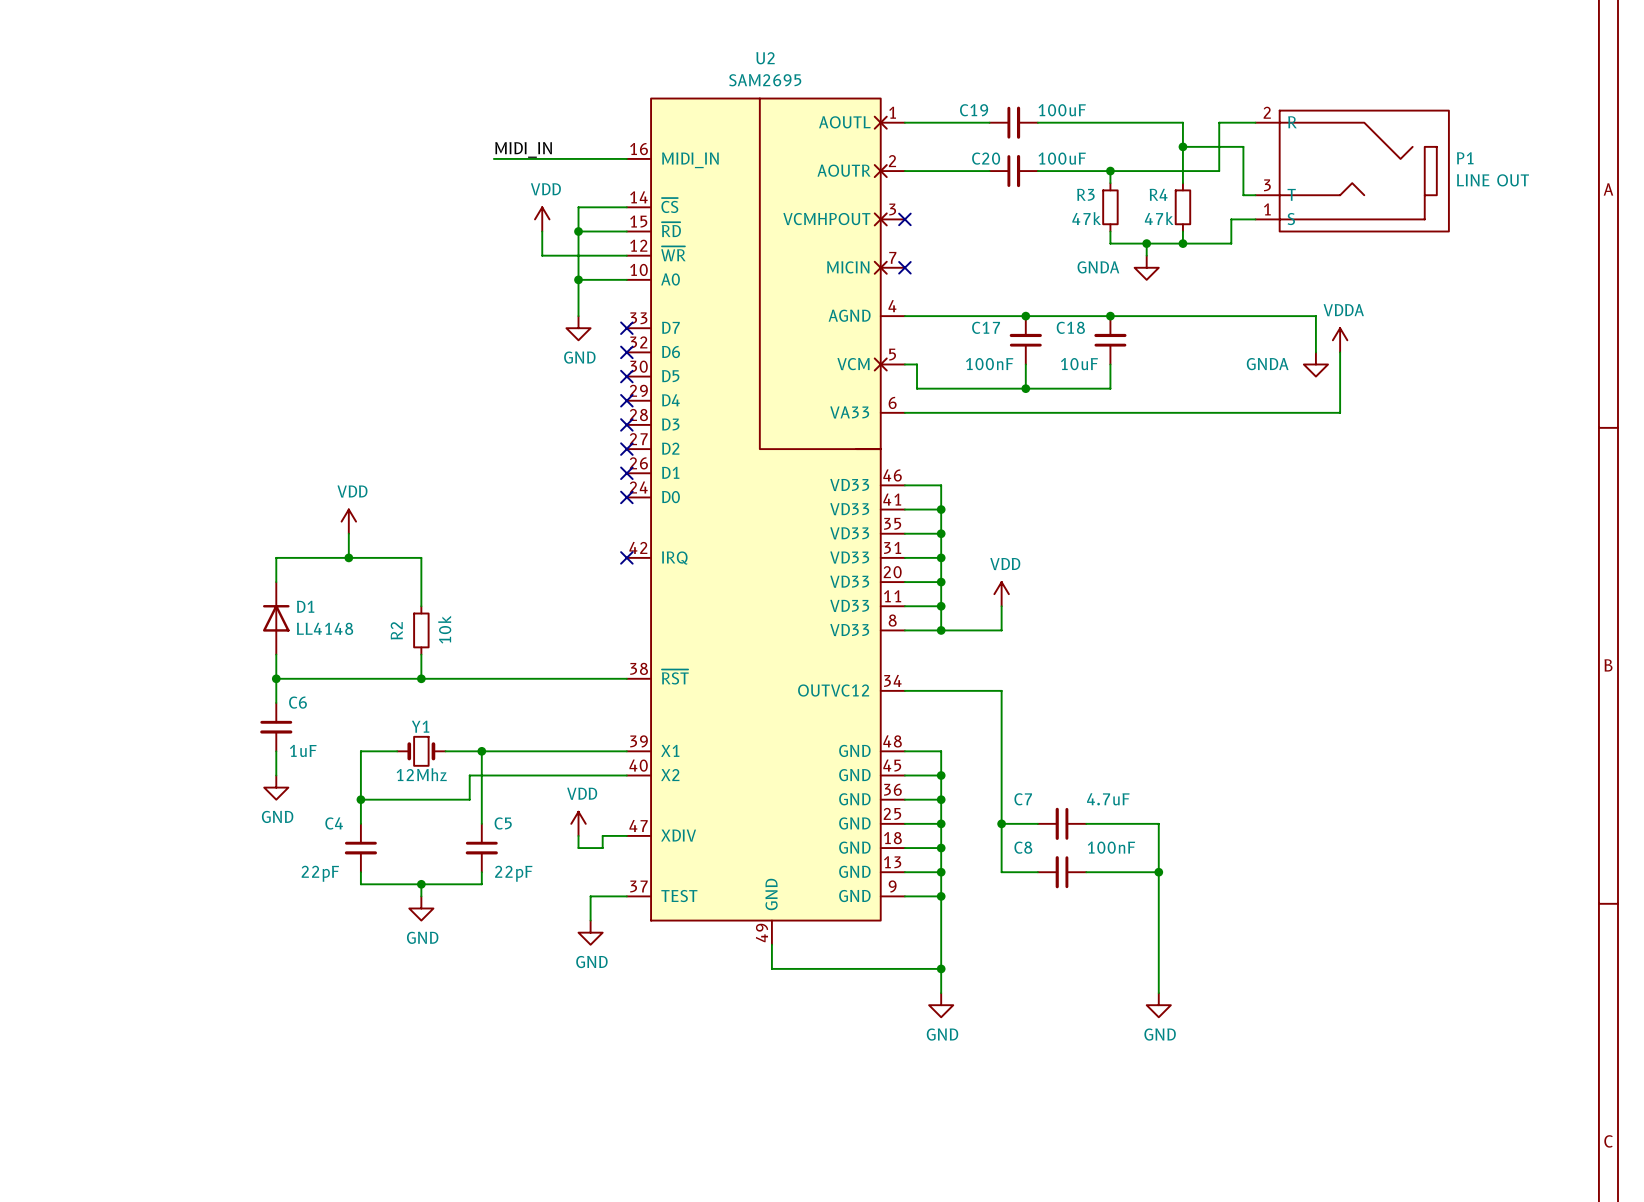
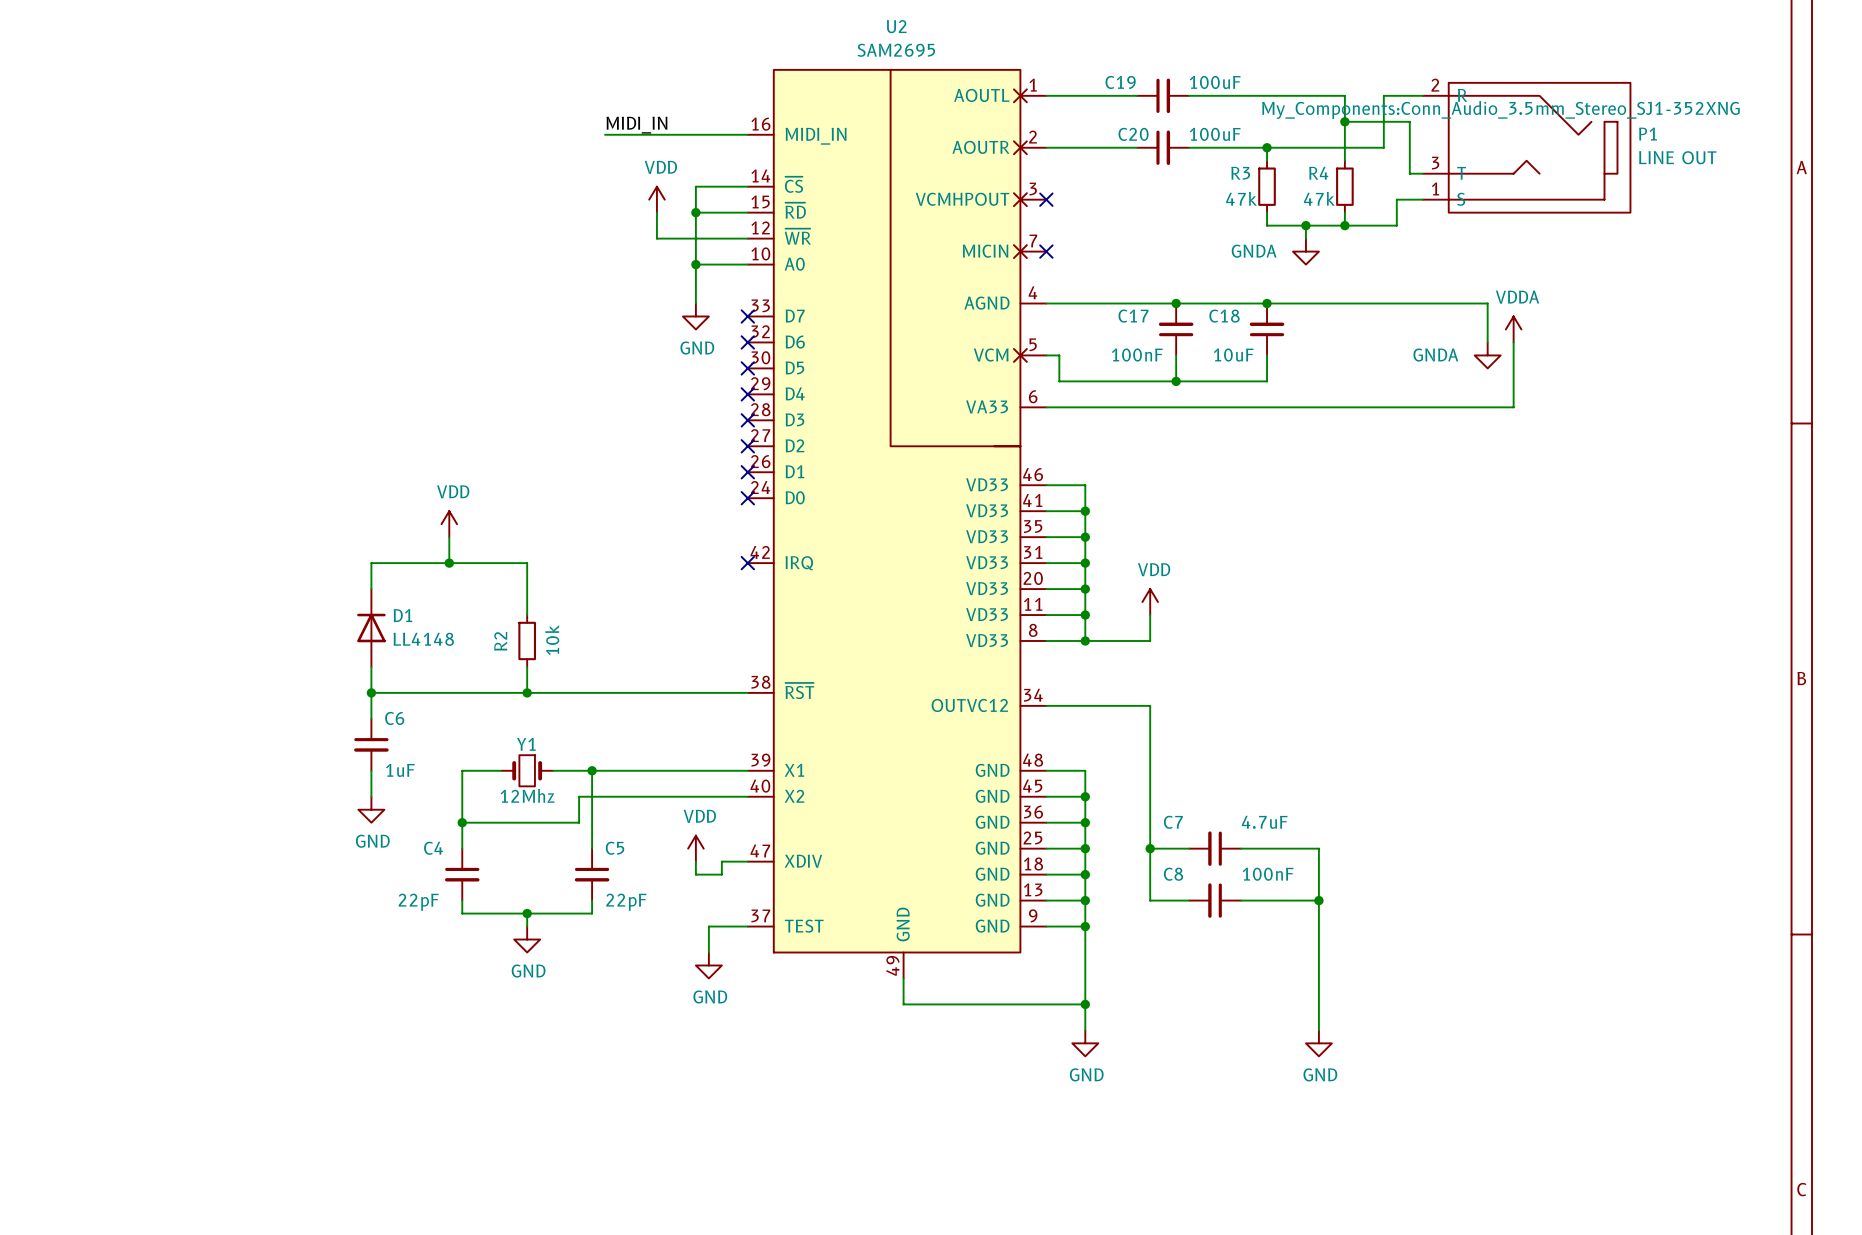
P1 text: none -> My_Components:Conn_Audio_3.5mm_Stereo_SJ1-352XNG (1500, 110)

